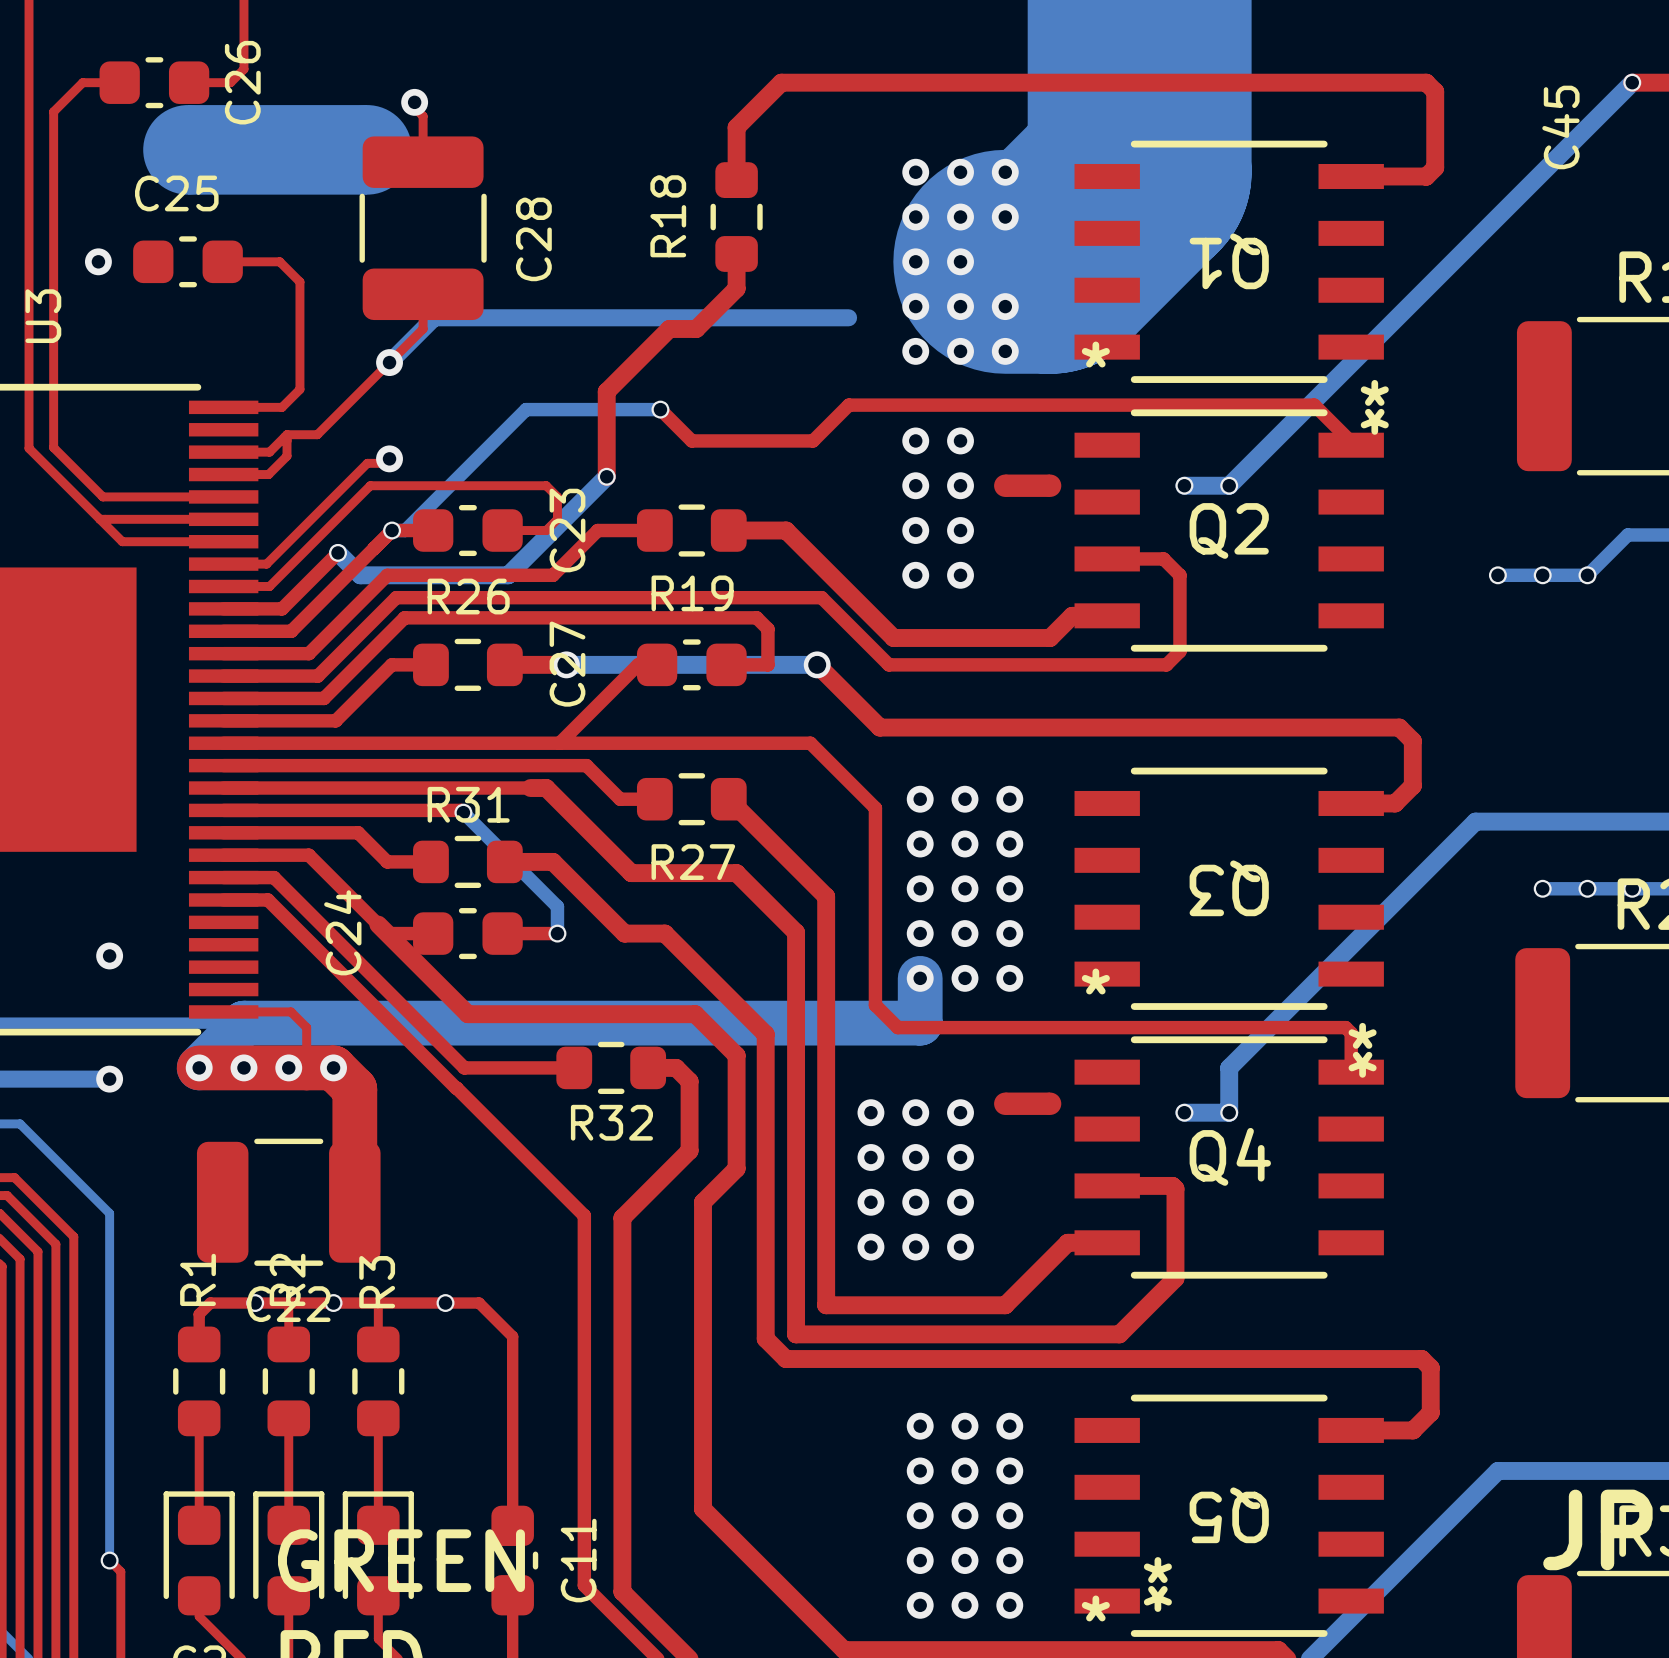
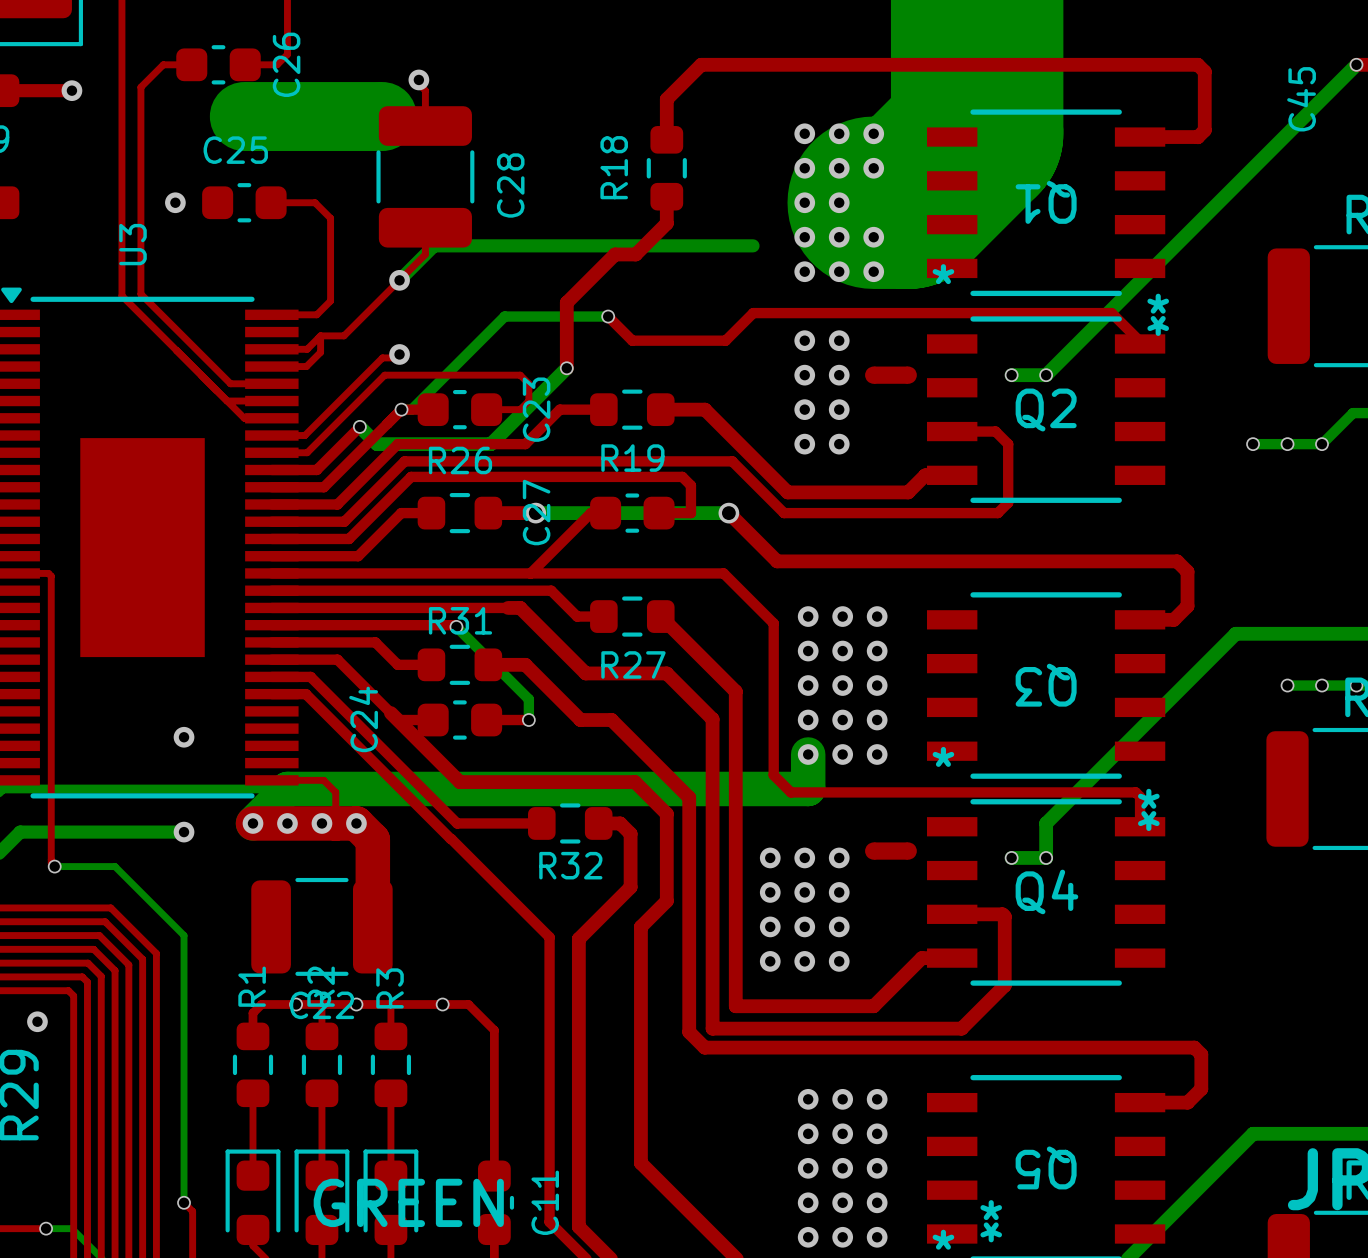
top track: (53, 380) (53, 447) (102, 496) (170, 496) -> (140, 294) (230, 383)
top track: (29, 382) (29, 448) (122, 541) (188, 541) -> (121, 295) (244, 418)
top track: (99, 519) (165, 519) -> none

